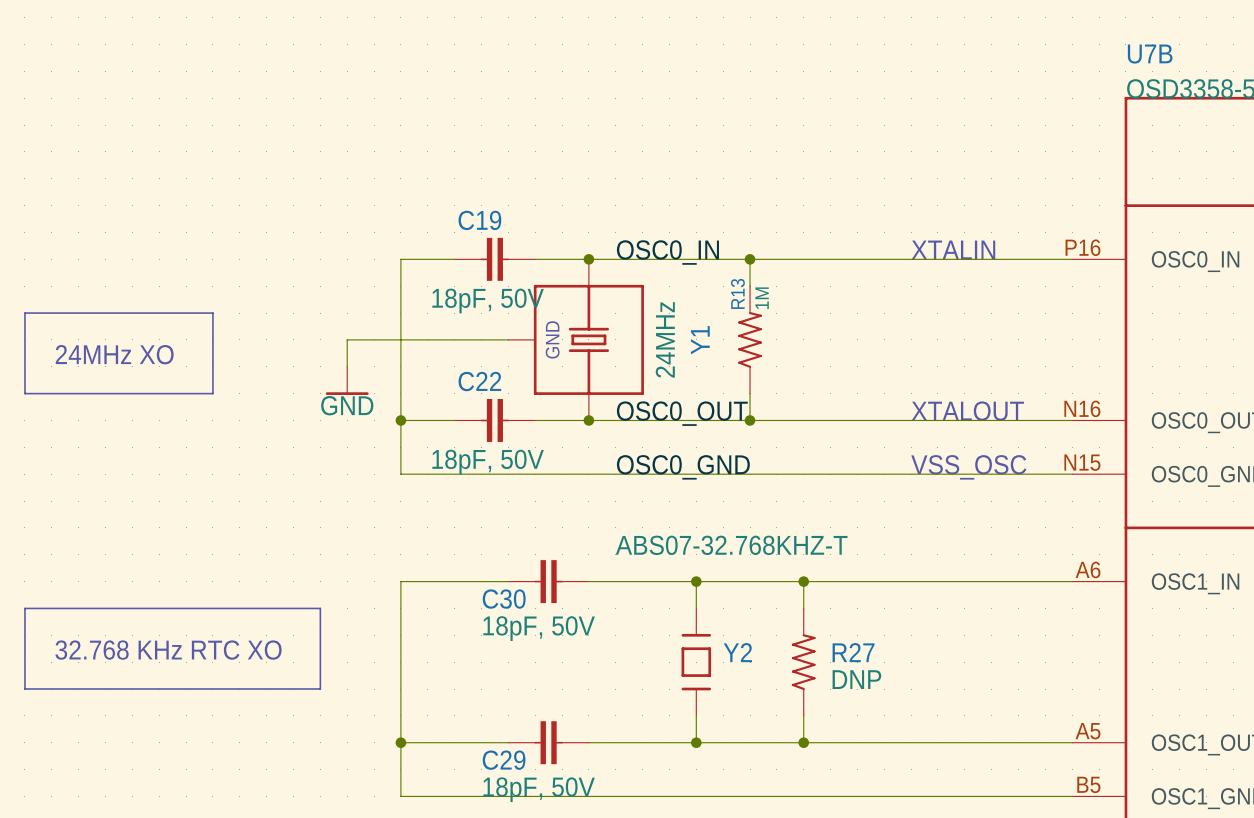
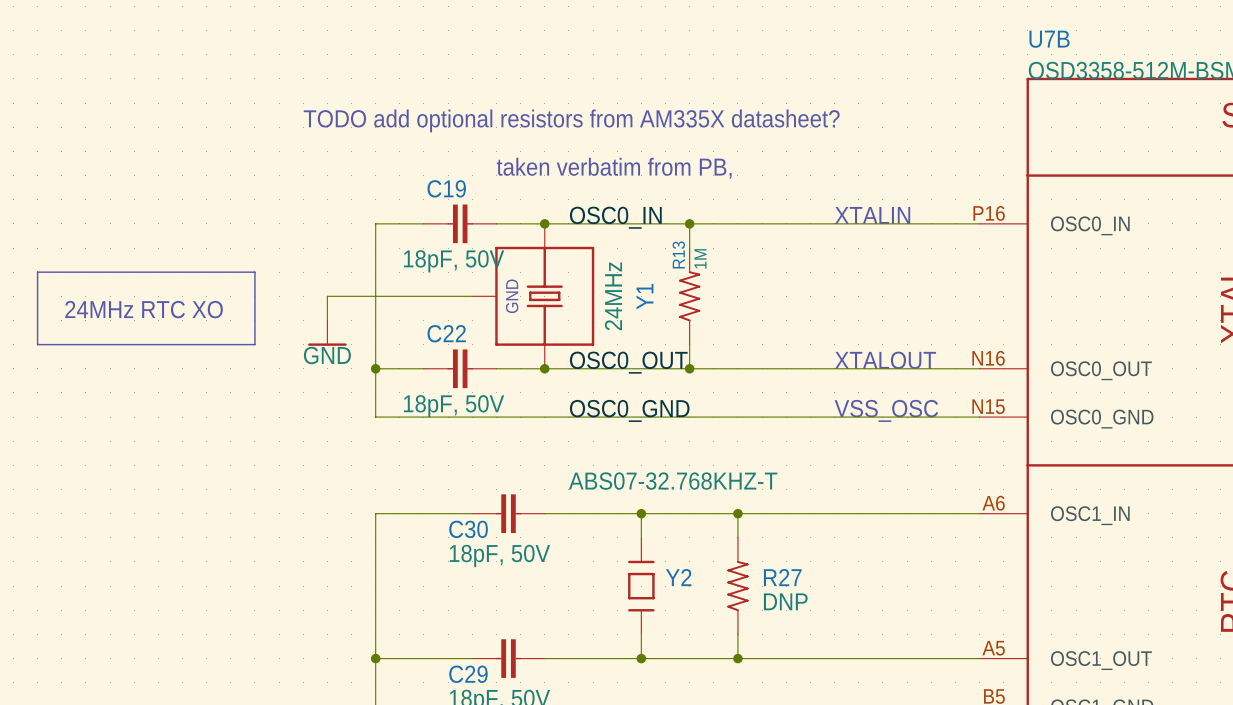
text: none -> TODO add optional resistors from AM335X datasheet? (571, 120)
text: none -> taken verbatim from PB, (614, 168)
line: (212, 313) (212, 393) -> (206, 272) (254, 272) (254, 344) (206, 344)
text: 24MHz XO (114, 354) -> 24MHz RTC XO (144, 309)
line: (24, 608) (24, 689) (320, 689) (320, 608) (24, 608) -> none
text: 32.768 KHz RTC XO (168, 650) -> none

